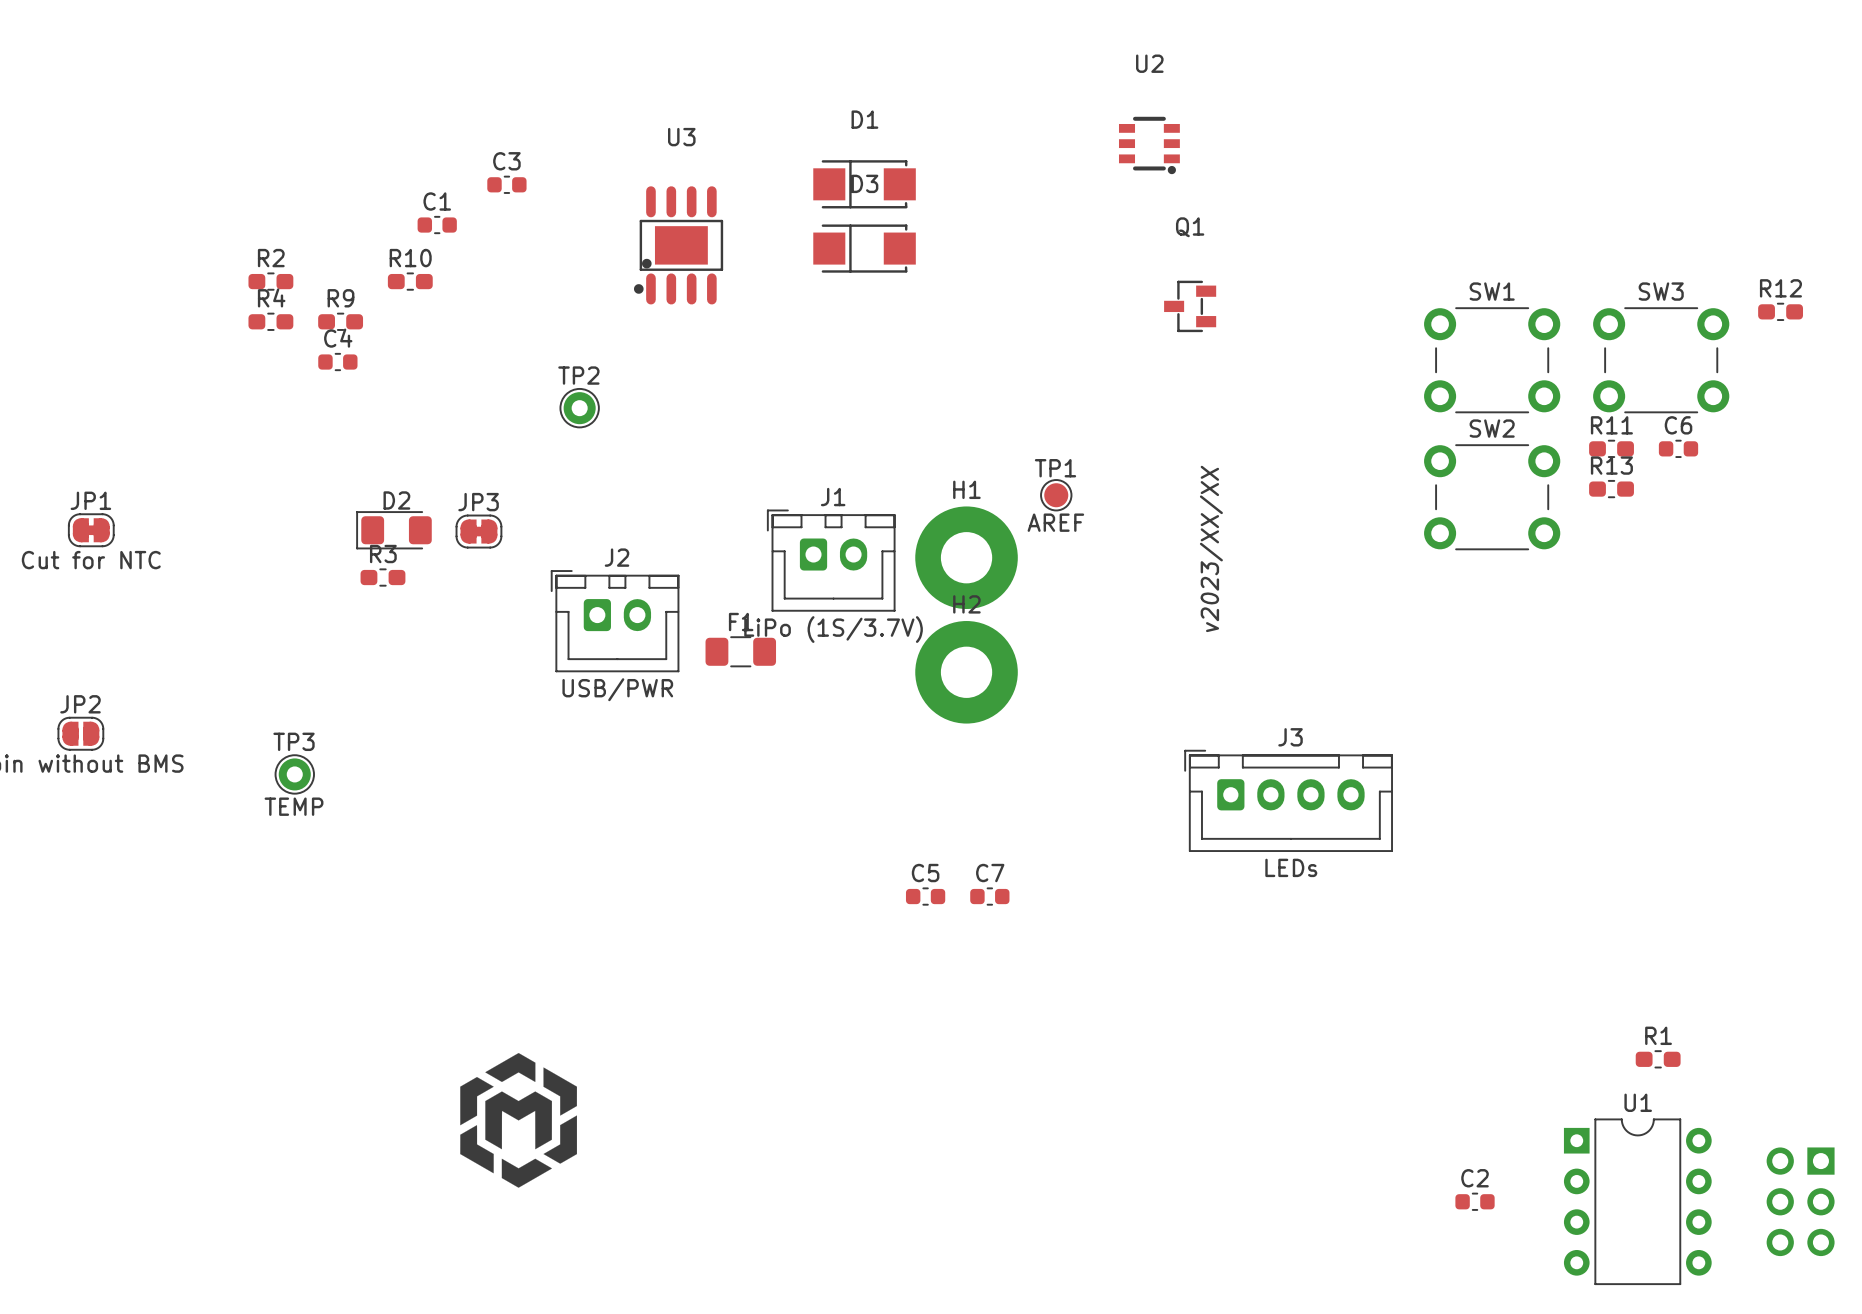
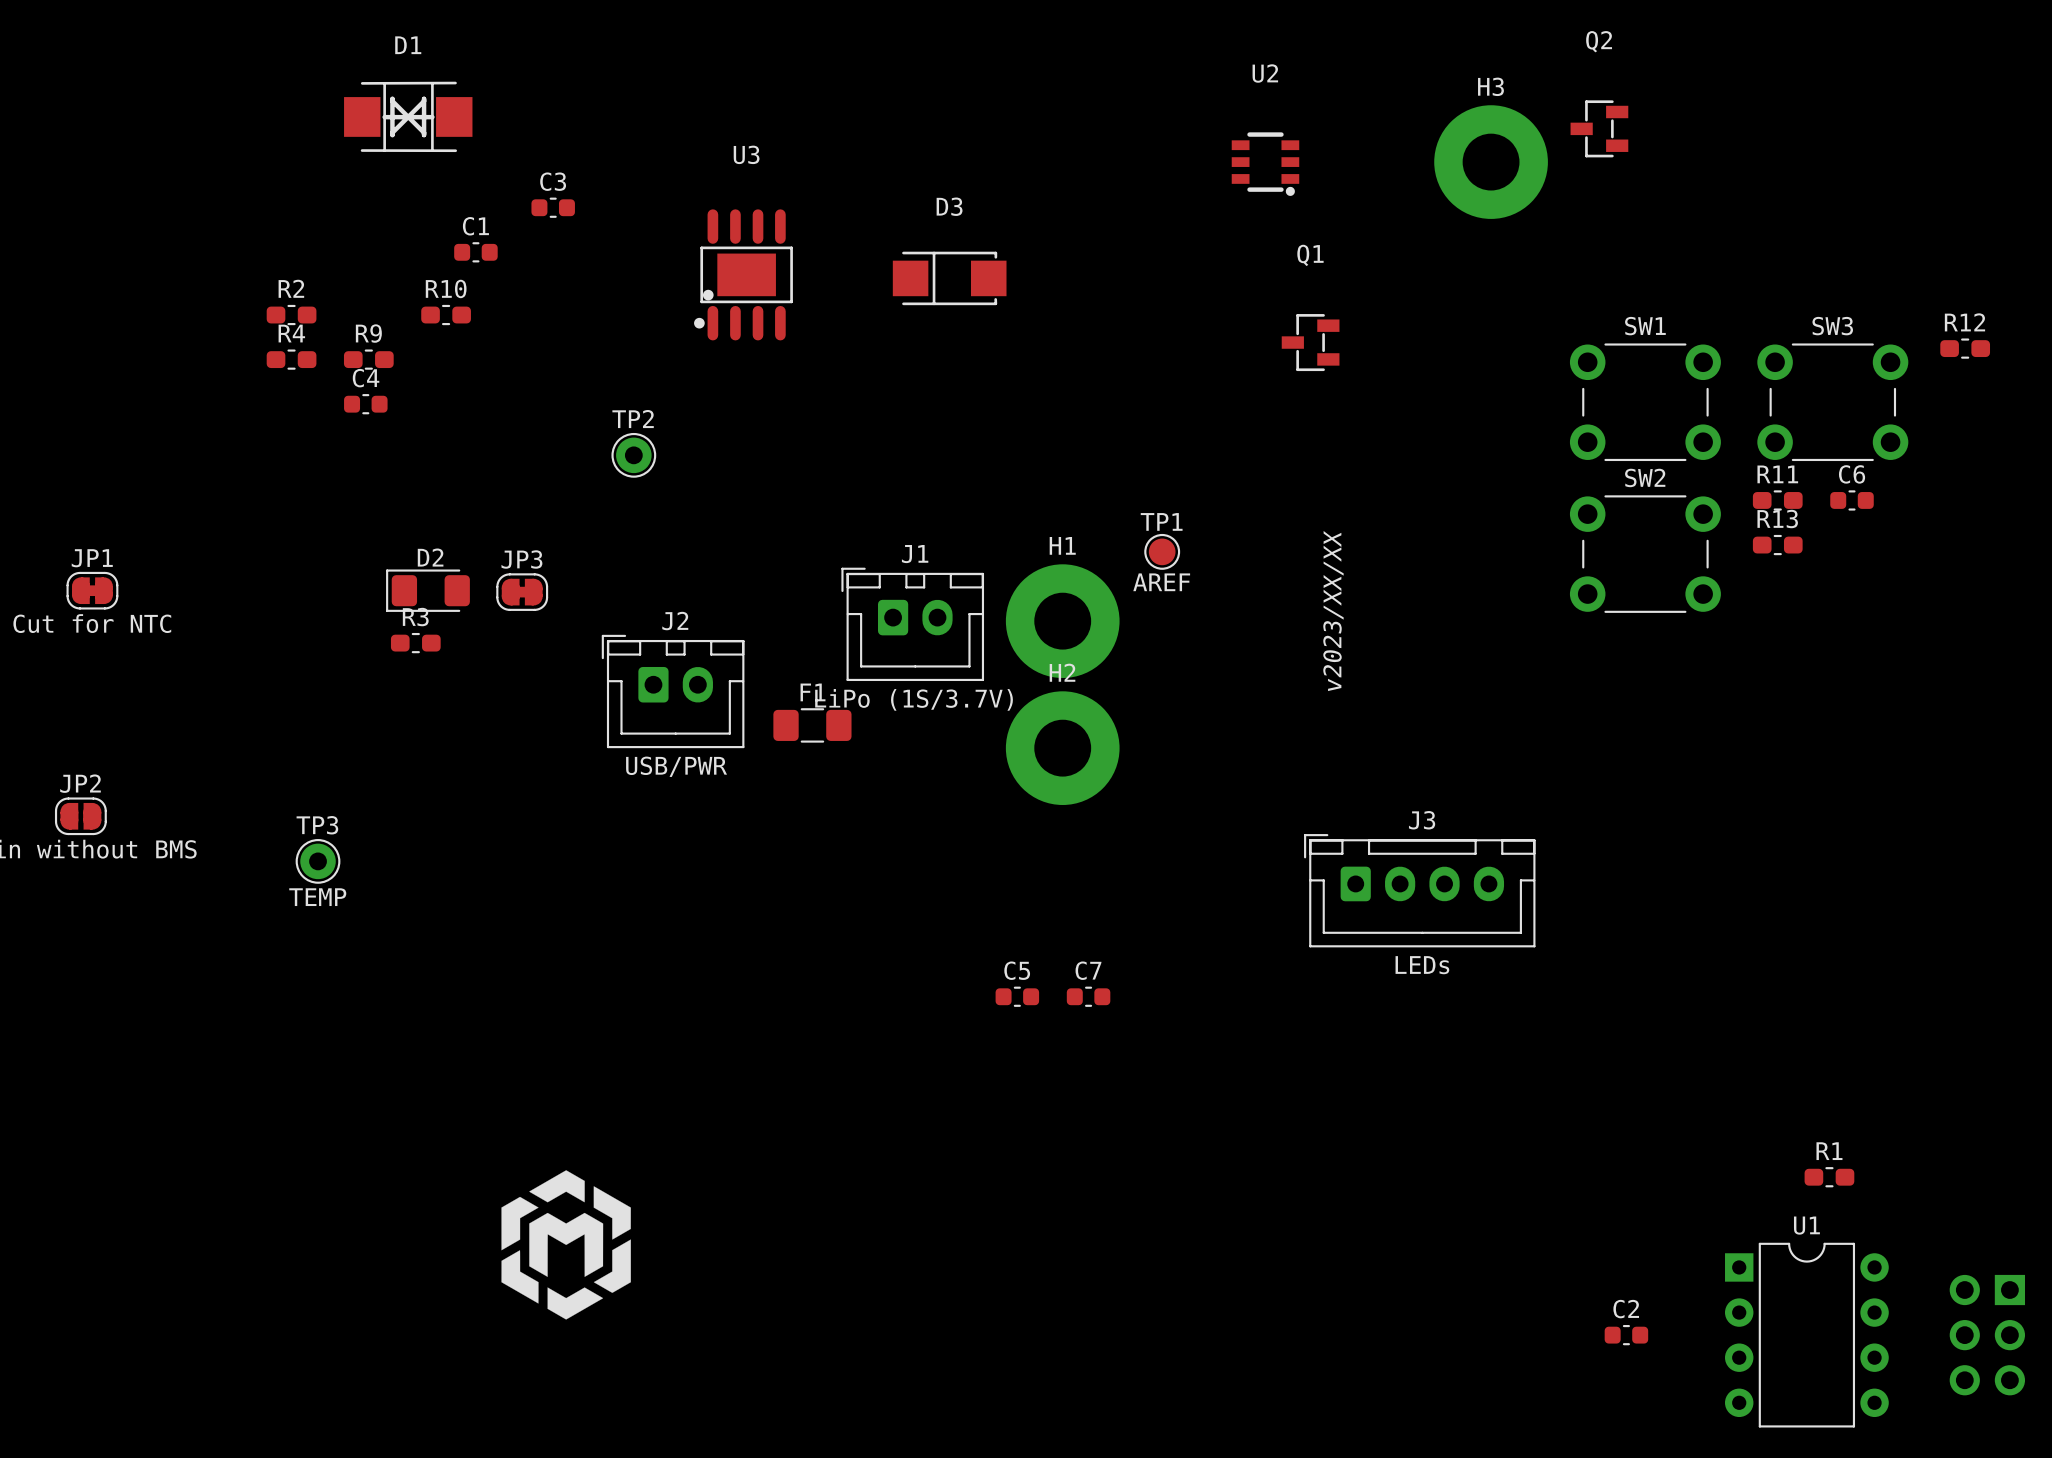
Q2: none -> (1599, 128)
H3: none -> (1491, 162)
D1 footprint: [813, 160, 916, 209] -> [344, 81, 473, 153]

